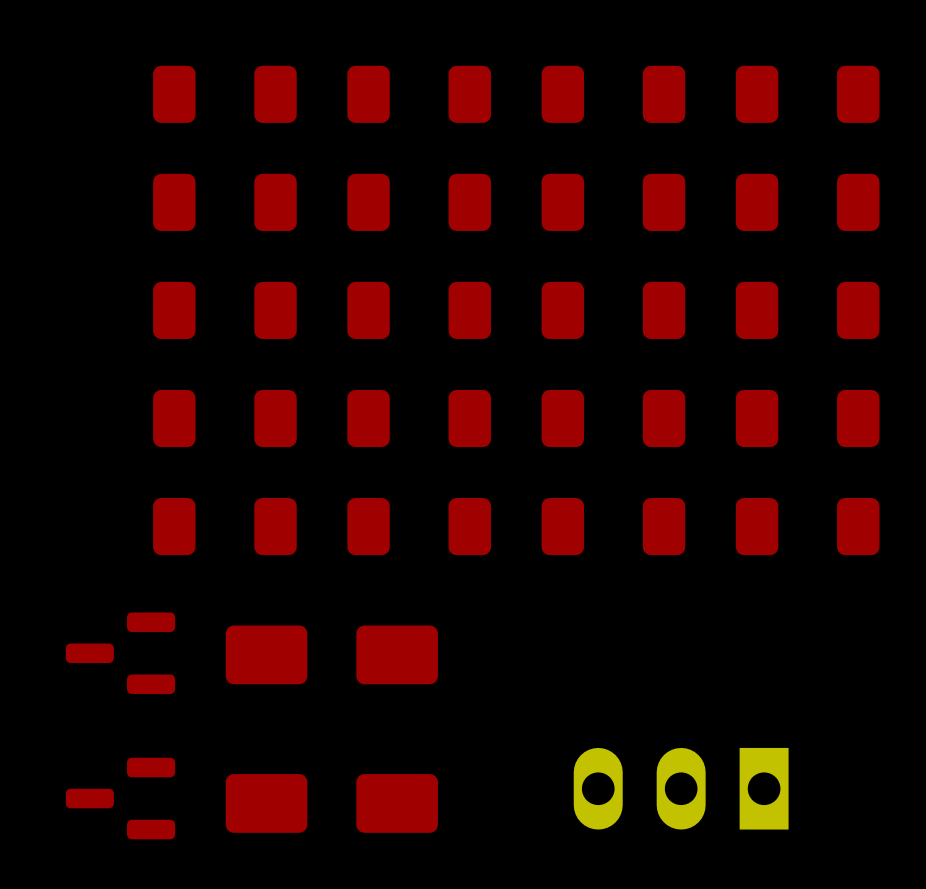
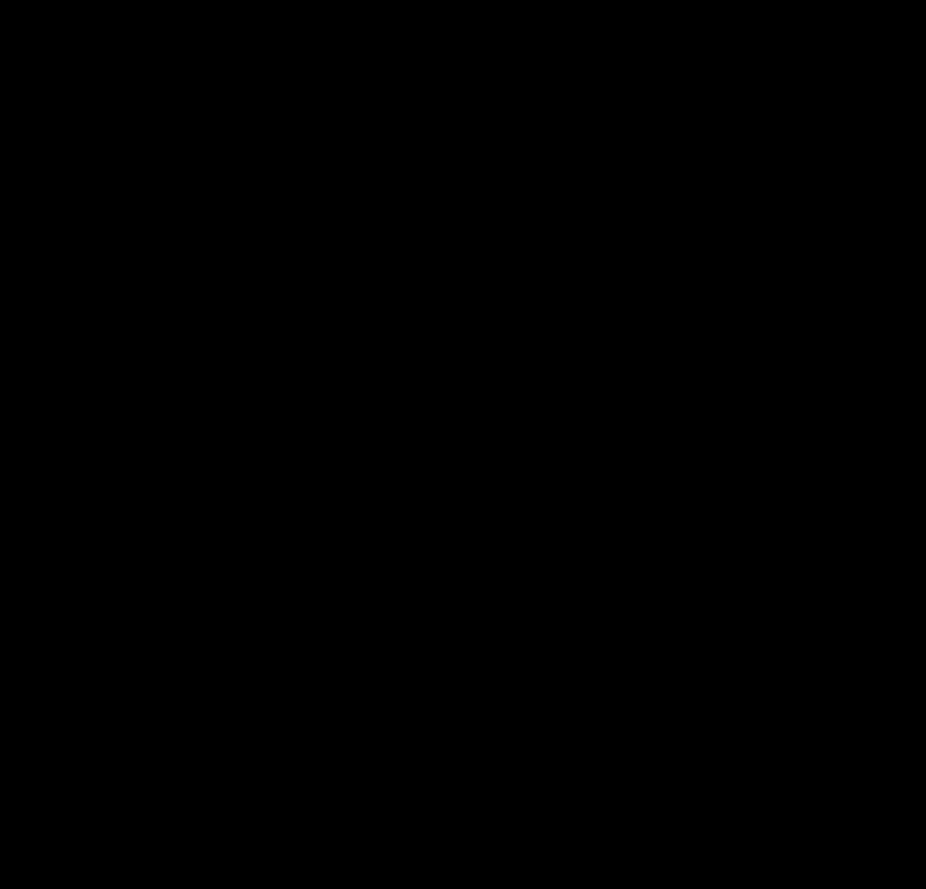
part: (224, 94) -> none
part: (419, 94) -> none
part: (613, 94) -> none
part: (807, 94) -> none
part: (224, 202) -> none
part: (419, 202) -> none
part: (613, 202) -> none
part: (807, 202) -> none
part: (224, 310) -> none
part: (419, 310) -> none
part: (613, 310) -> none
part: (807, 310) -> none
part: (224, 418) -> none
part: (419, 418) -> none
part: (613, 418) -> none
part: (807, 418) -> none
part: (224, 526) -> none
part: (419, 526) -> none
part: (613, 526) -> none
part: (807, 526) -> none
part: (120, 653) -> none
part: (331, 654) -> none
part: (681, 788) -> none
part: (120, 798) -> none
part: (331, 803) -> none

